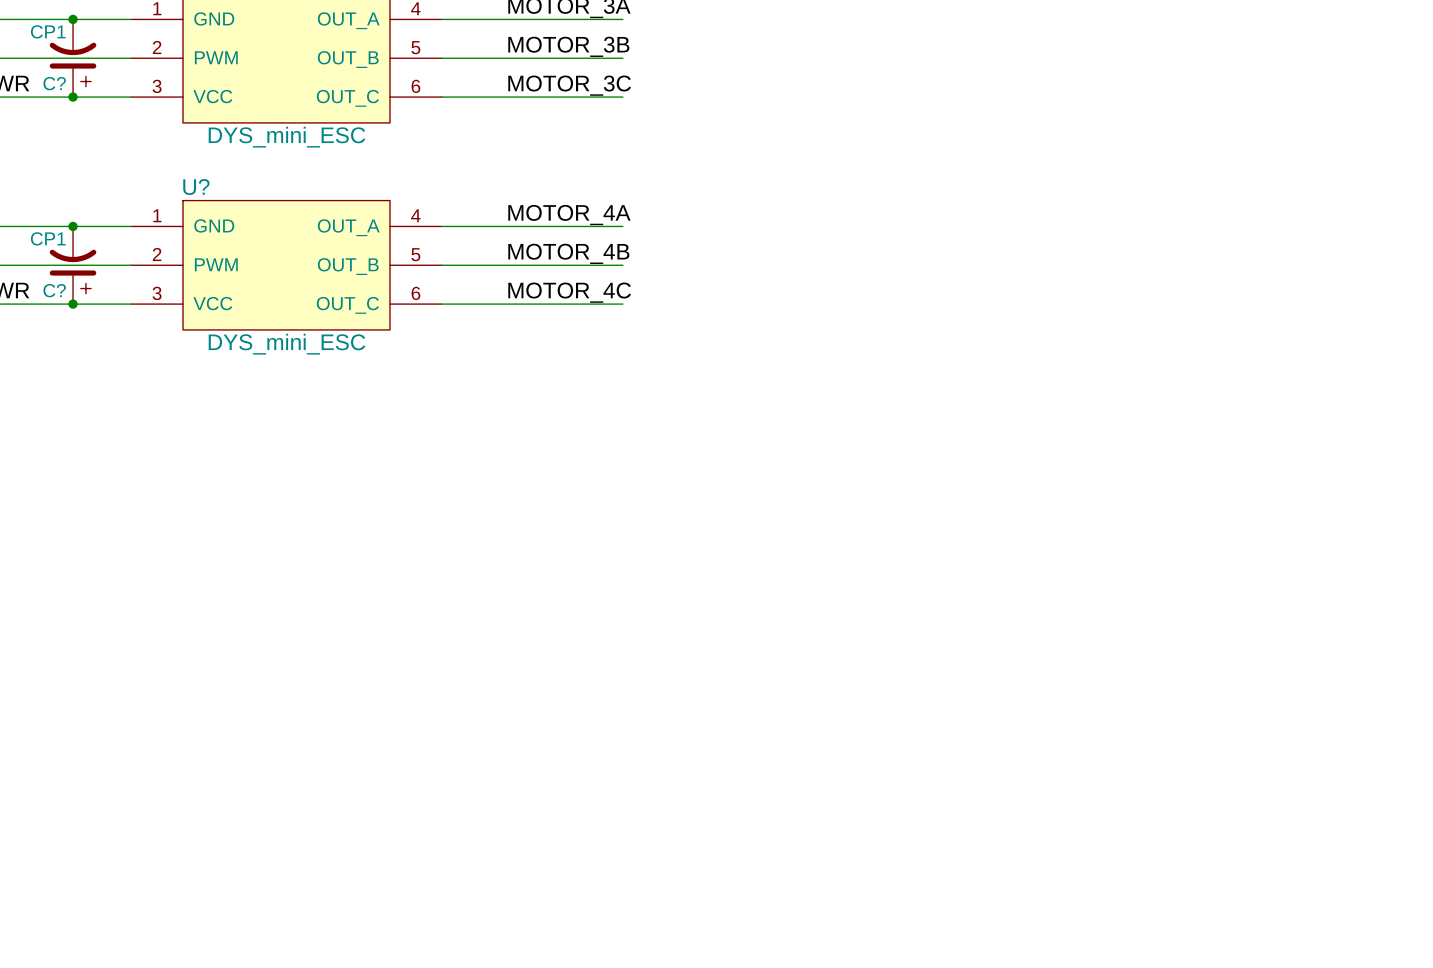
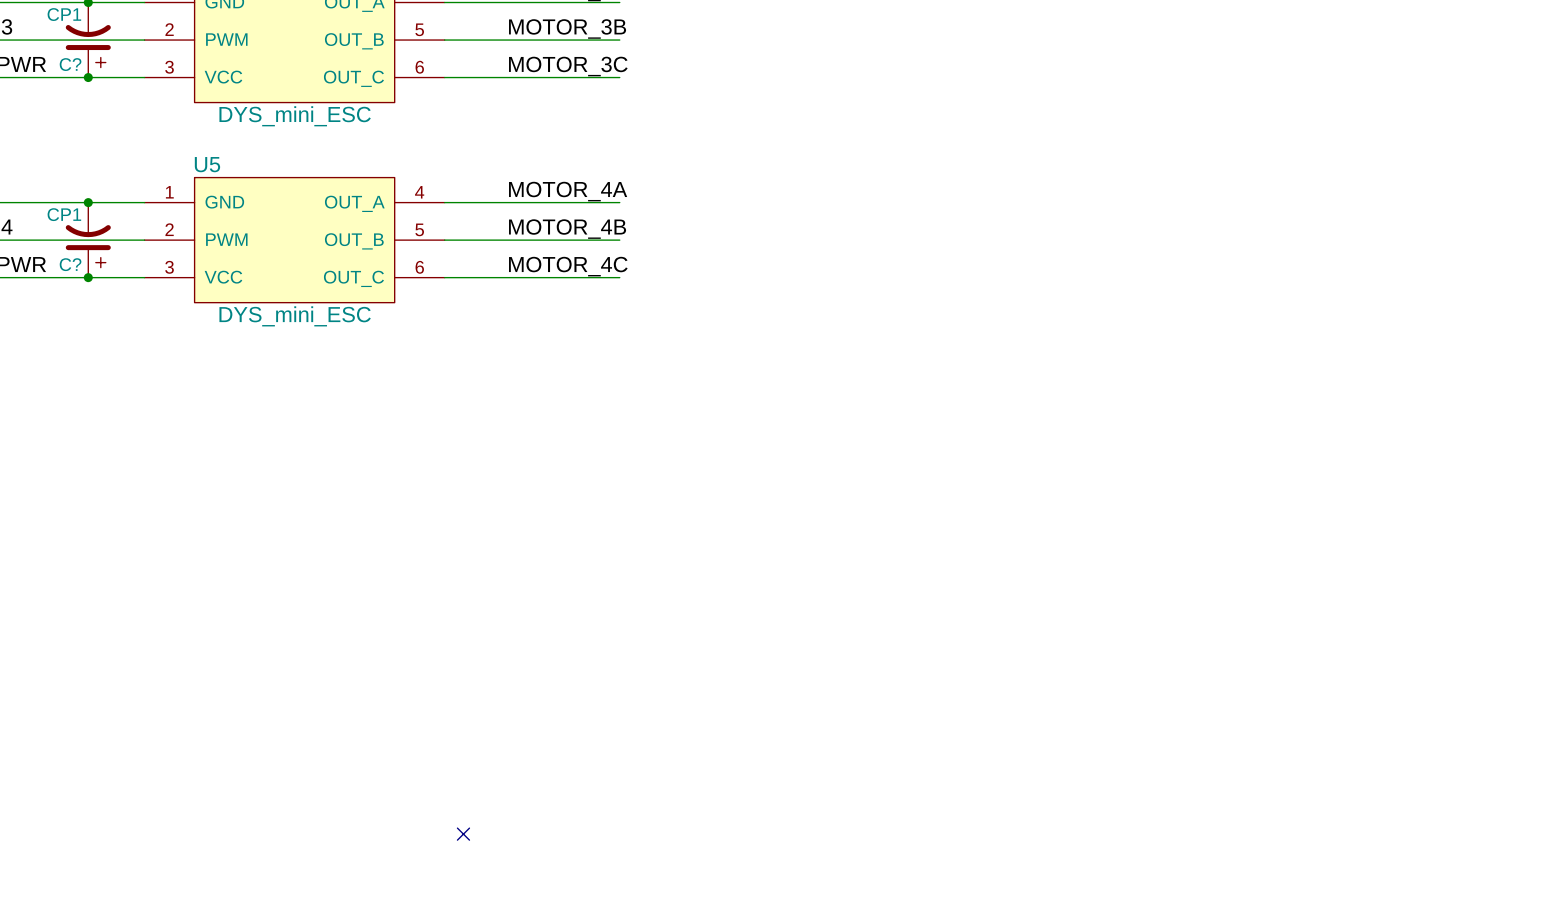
U? name: U? (196, 187) -> U5 (207, 164)
no-connect mark: none -> (463, 834)

